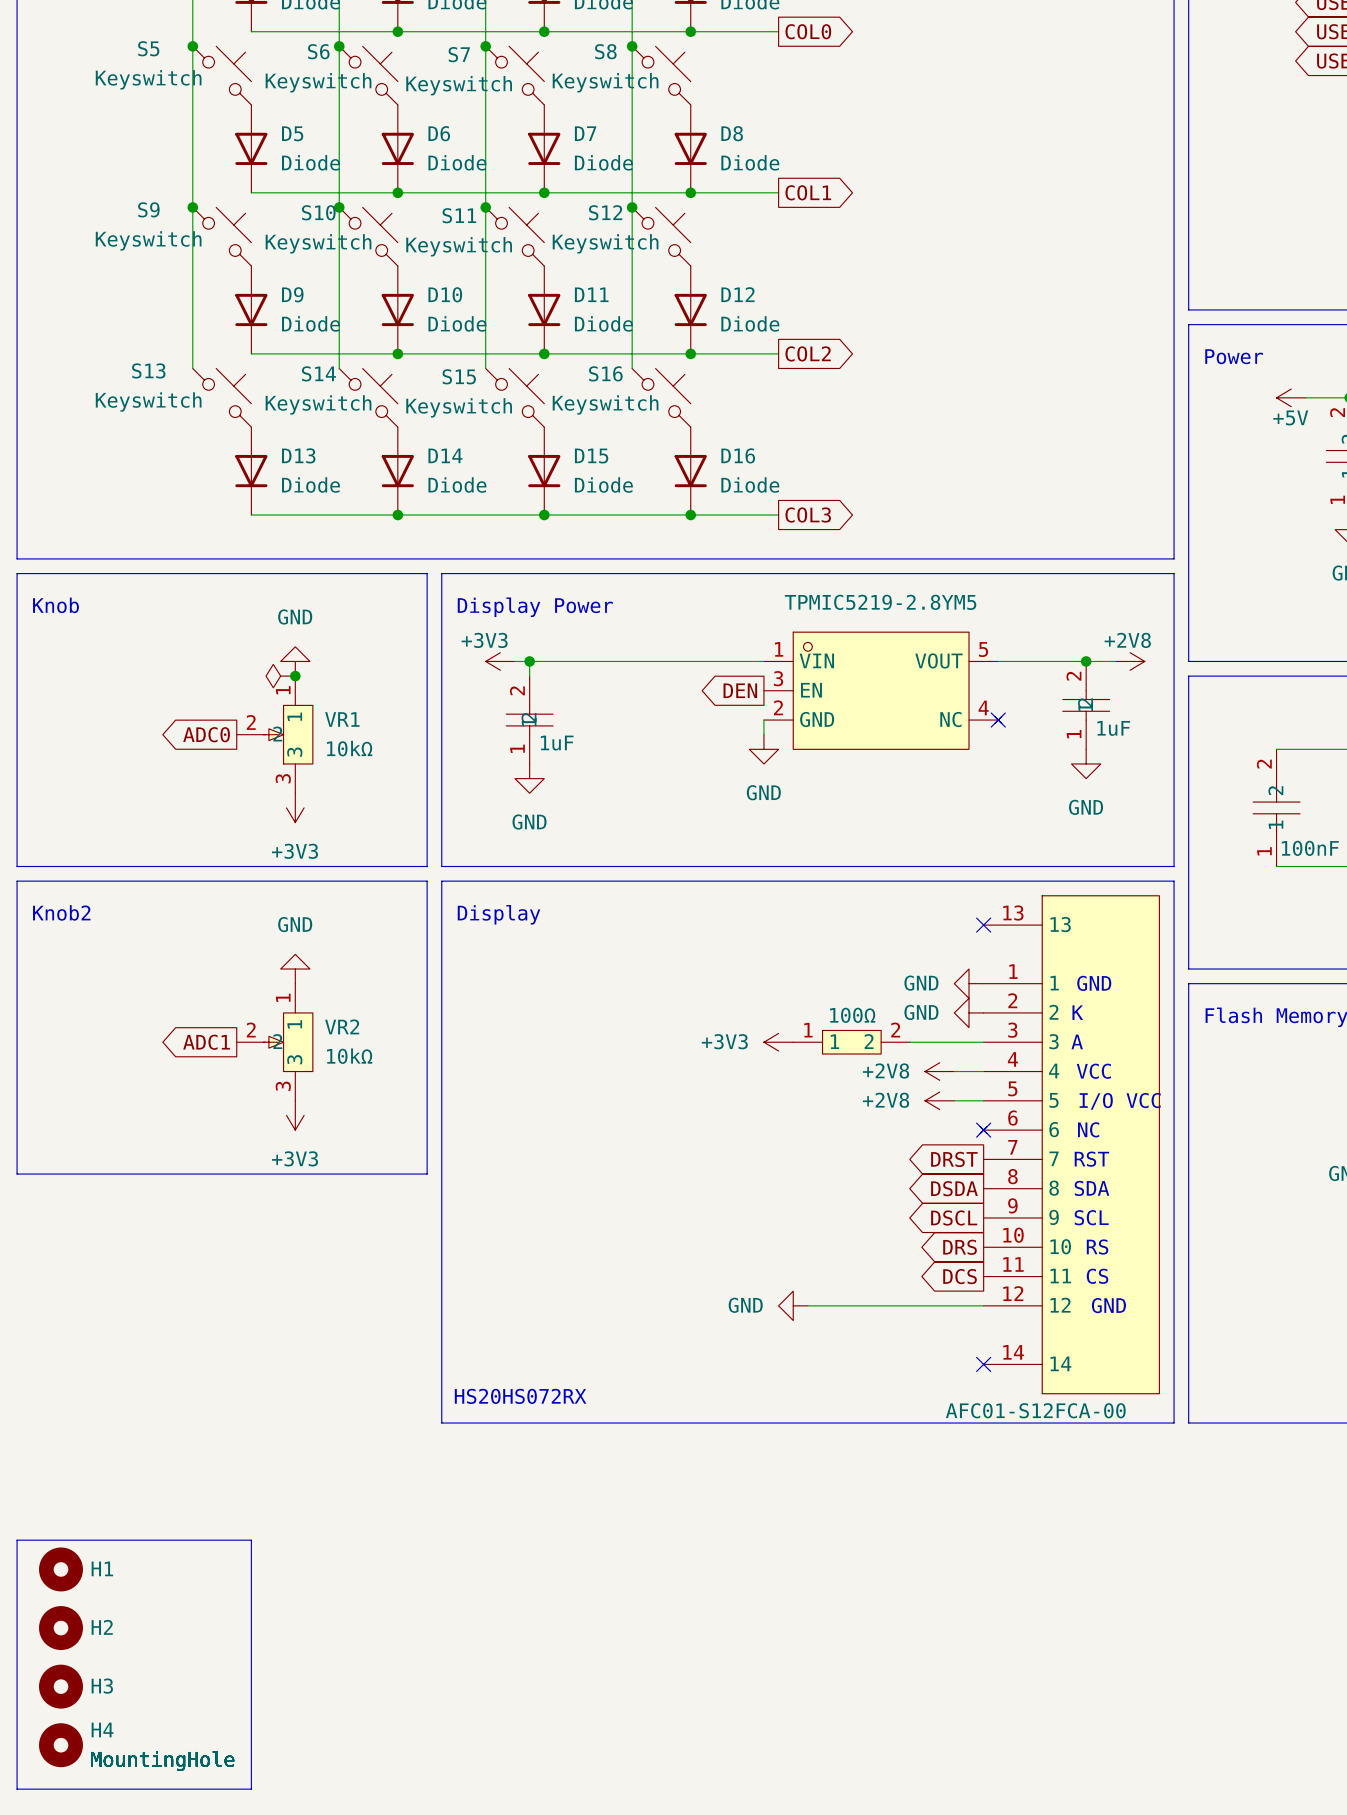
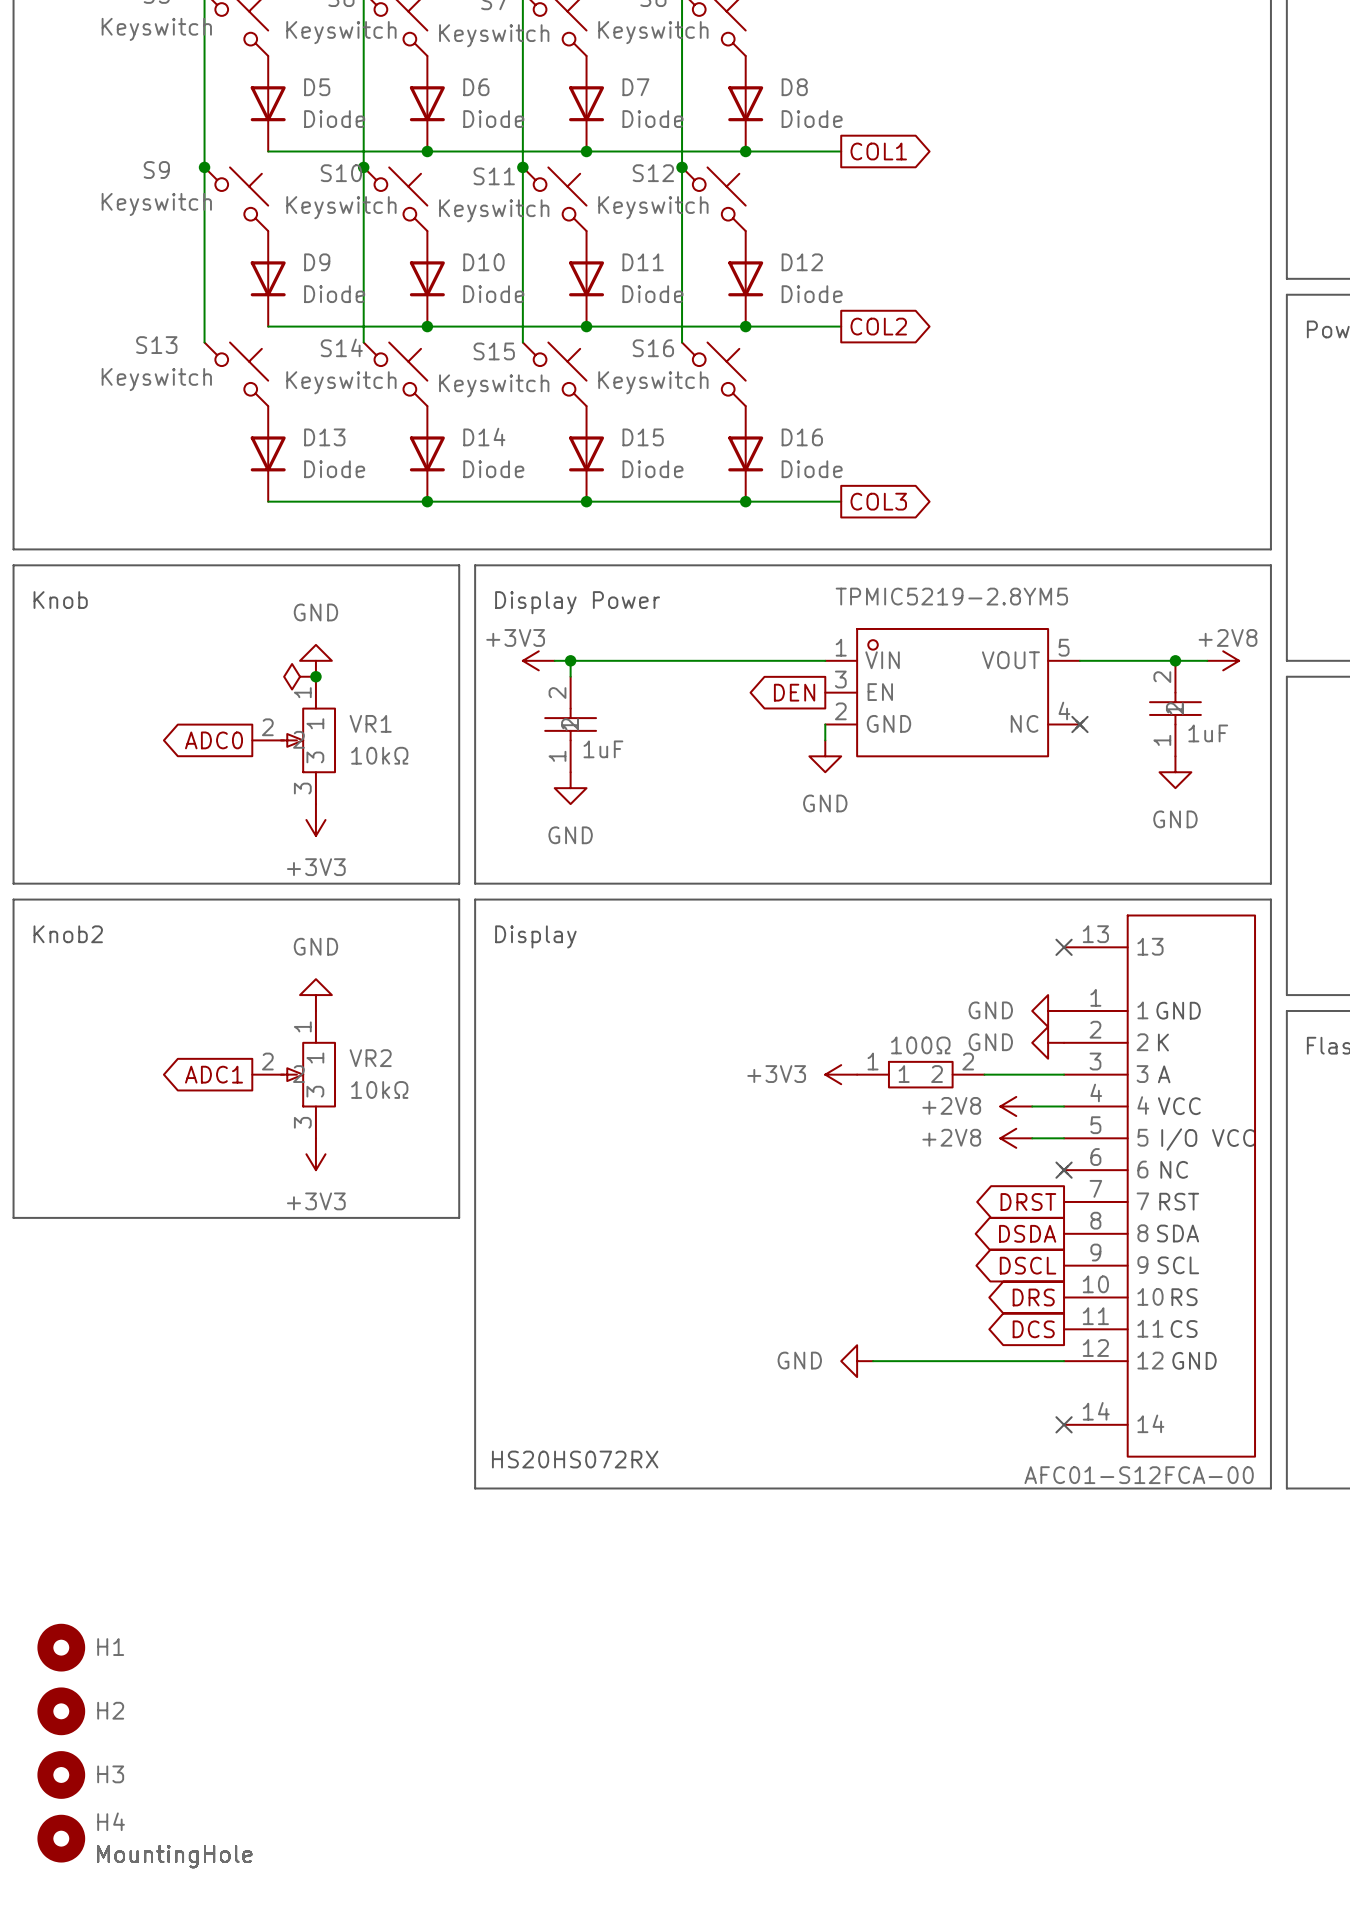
line: (17, 1540) (251, 1540) (251, 1789) (17, 1789) (17, 1540) -> none

